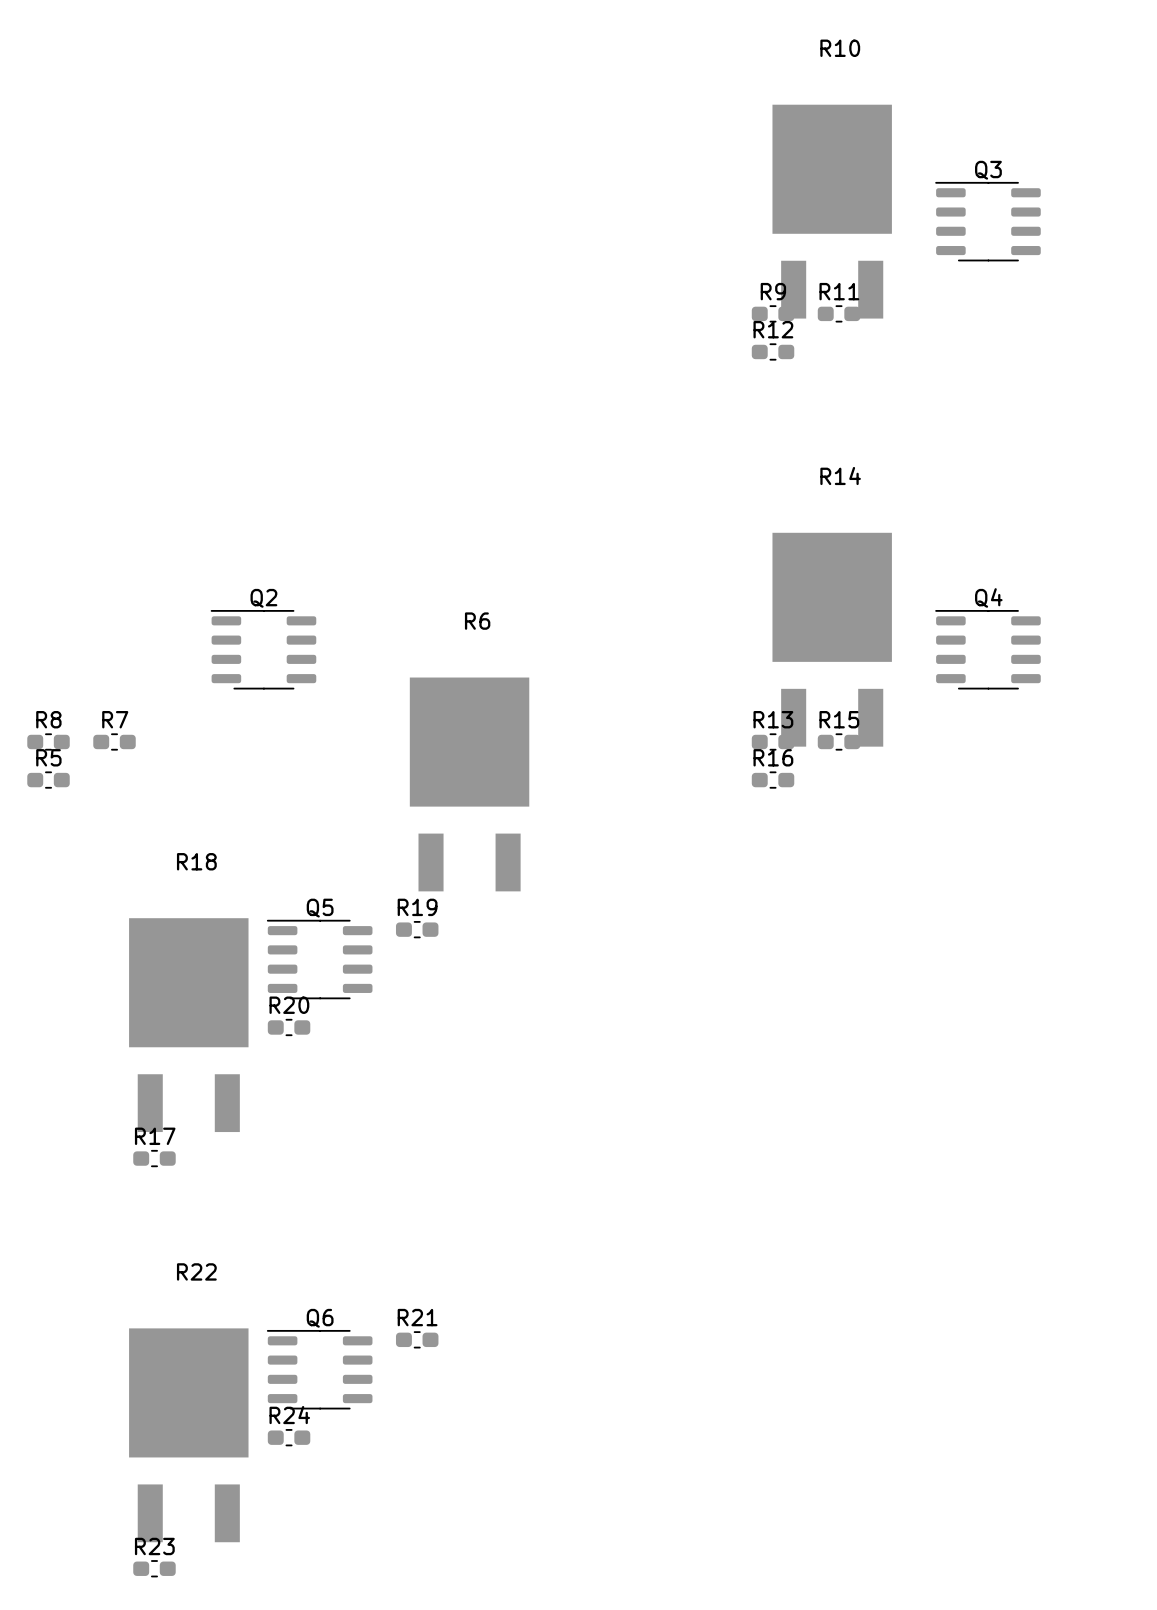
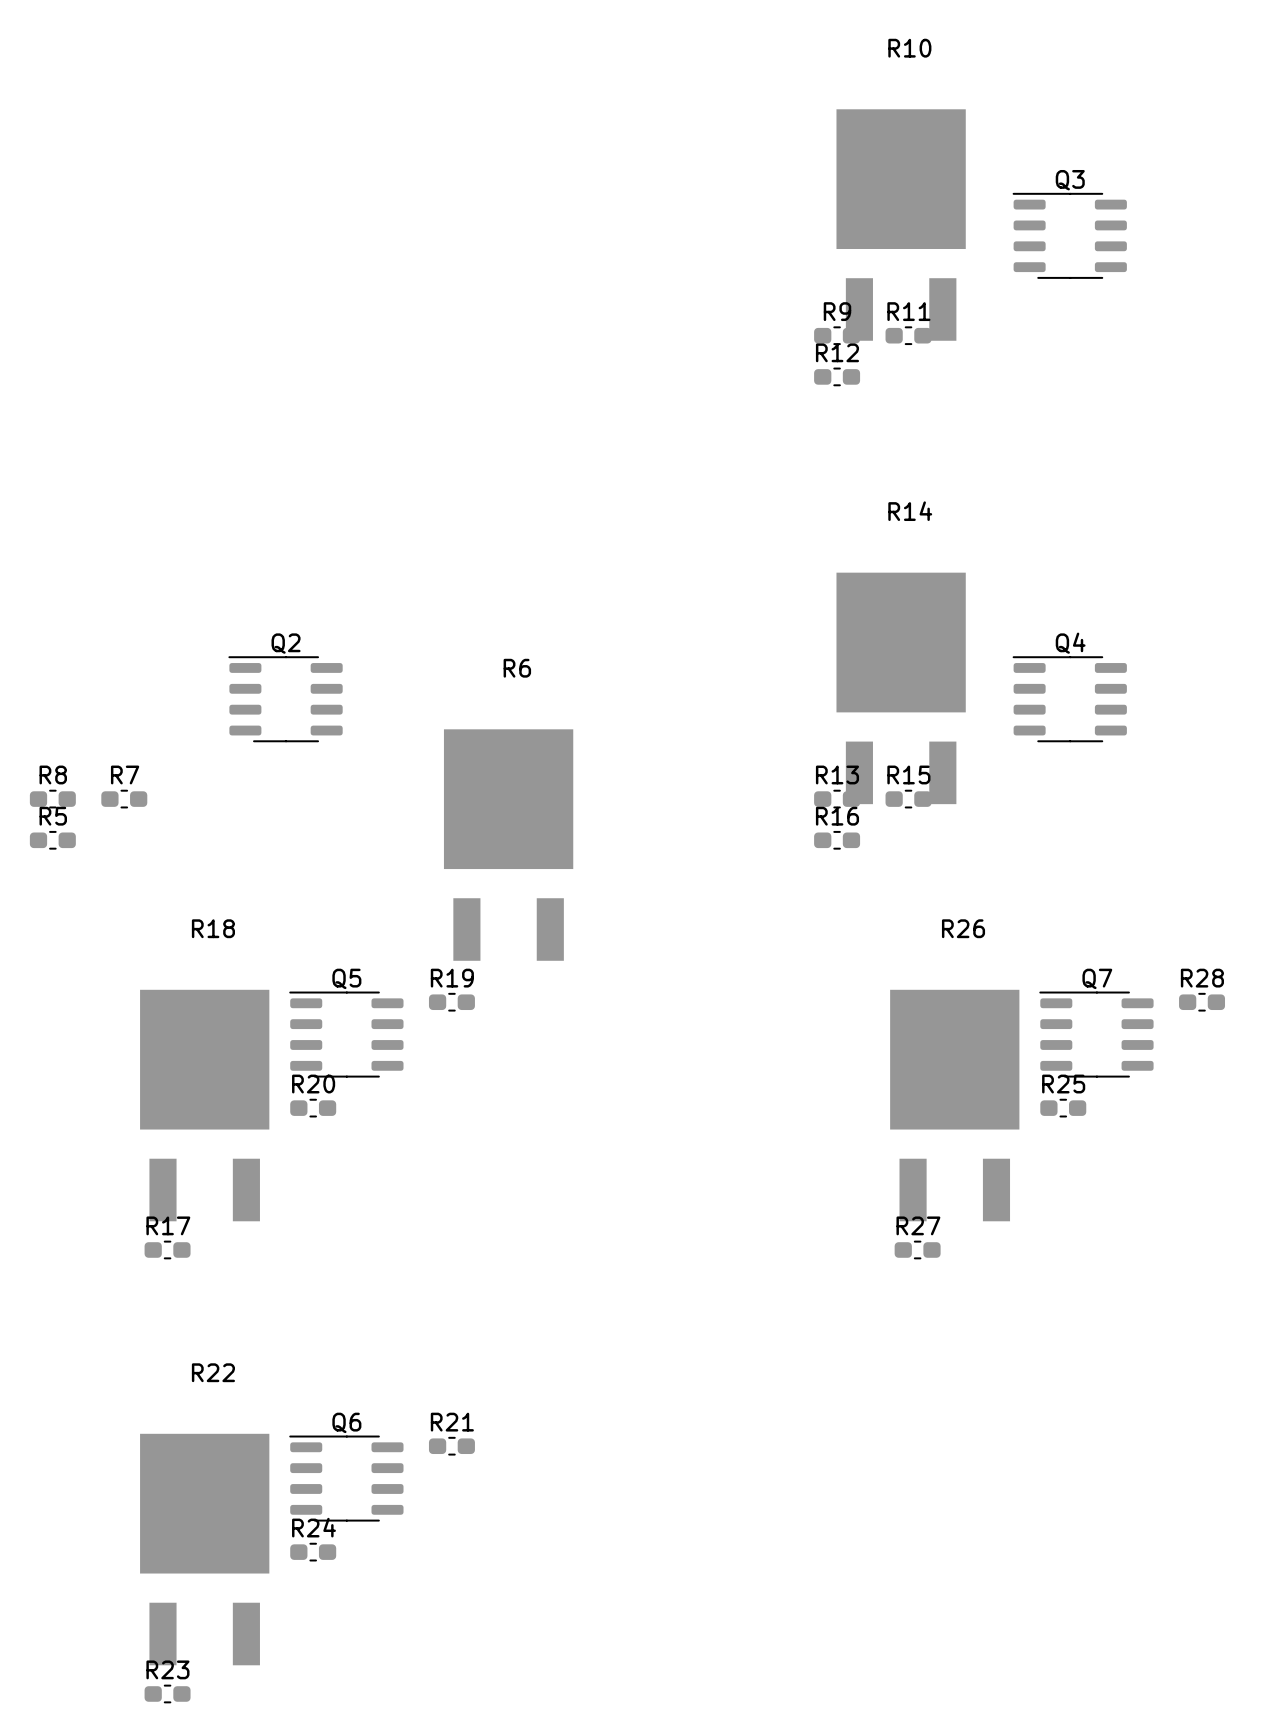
R28: none -> (1202, 1002)
Q7: none -> (1096, 1034)
R26: none -> (954, 1105)
R25: none -> (1063, 1108)
R27: none -> (917, 1249)

